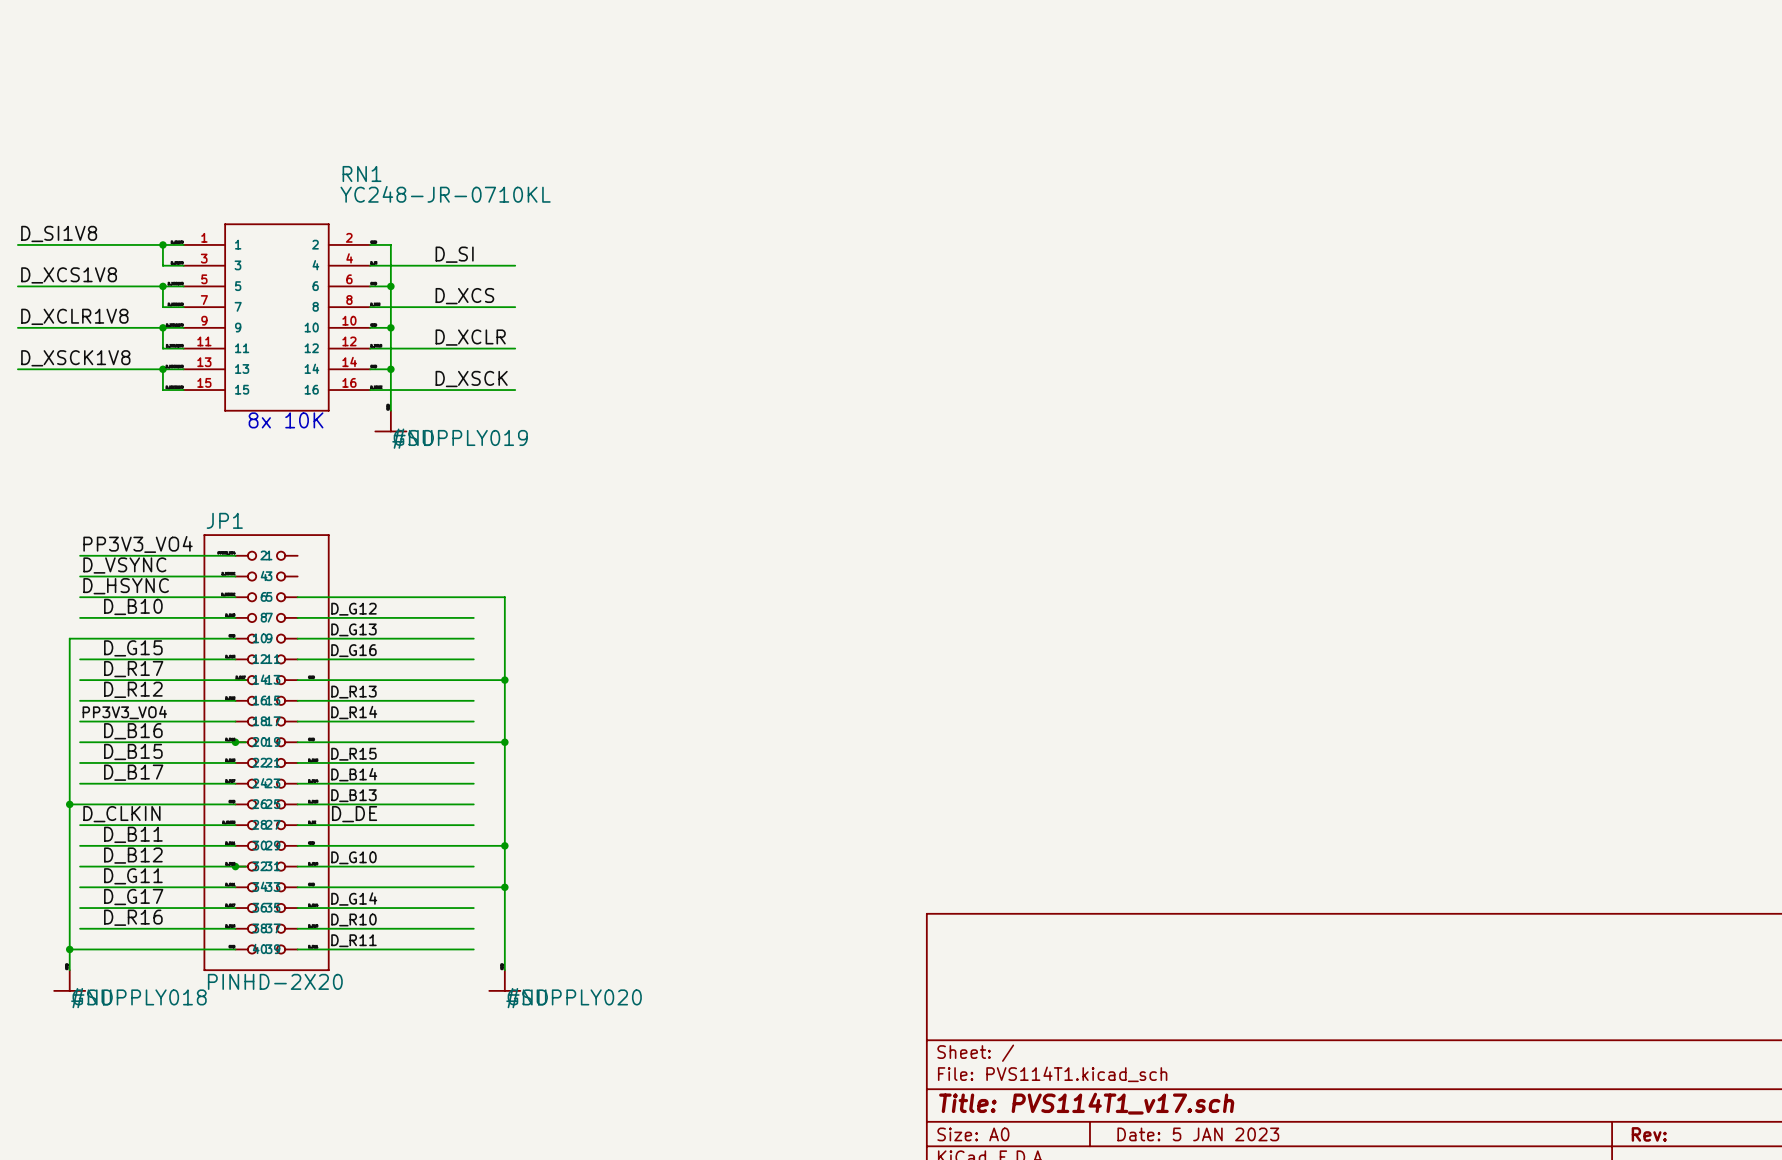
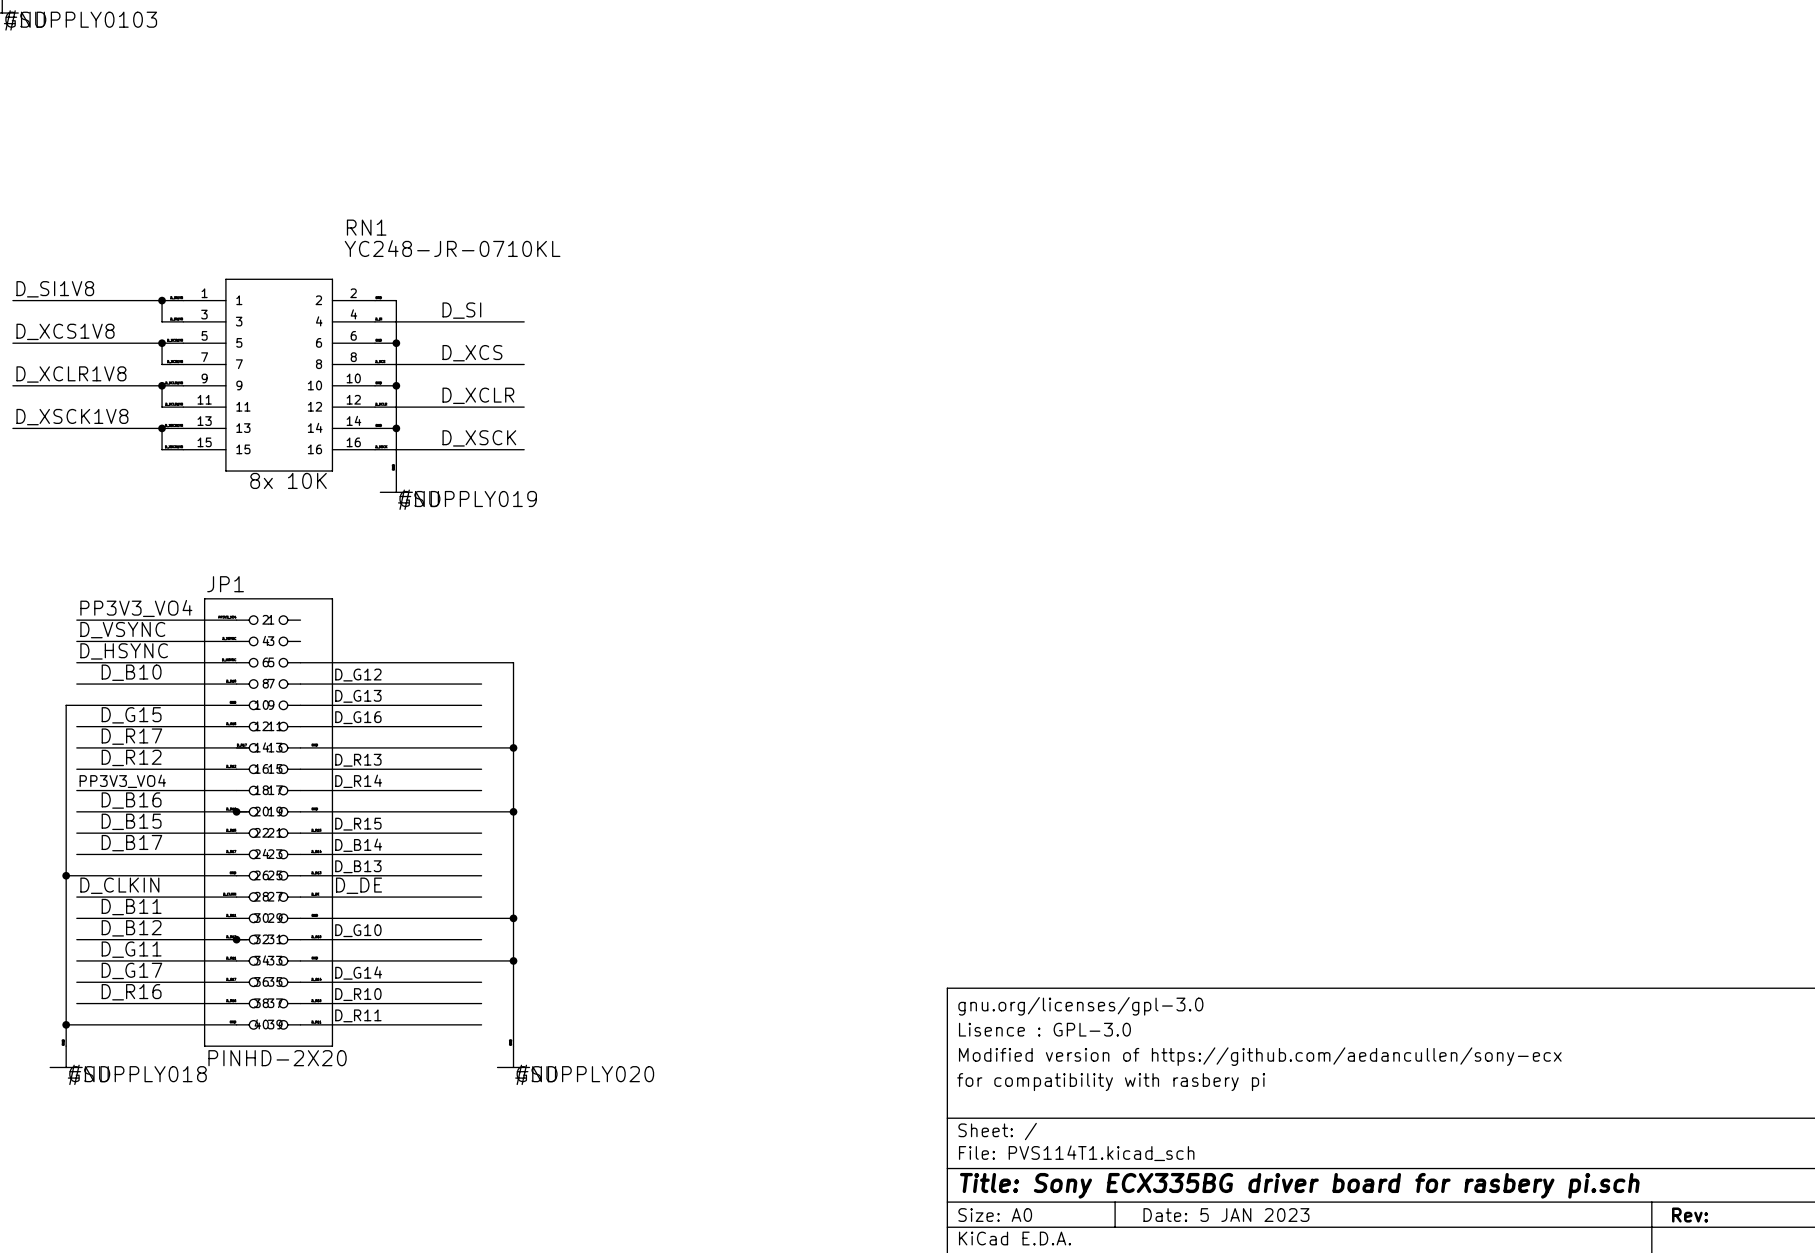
title block: none -> gnu.org/licenses/gpl-3.0 (1080, 1006)
title block: none -> Lisence : GPL-3.0 (1044, 1029)
title block: none -> Modified version of https://github.com/aedancullen/sony-ecx (1260, 1056)
title block: none -> for compatibility with rasbery pi (1111, 1082)
title block: Title: PVS114T1_v17.sch (1086, 1103) -> Title: Sony ECX335BG driver board for rasbery pi.sch (1299, 1185)

